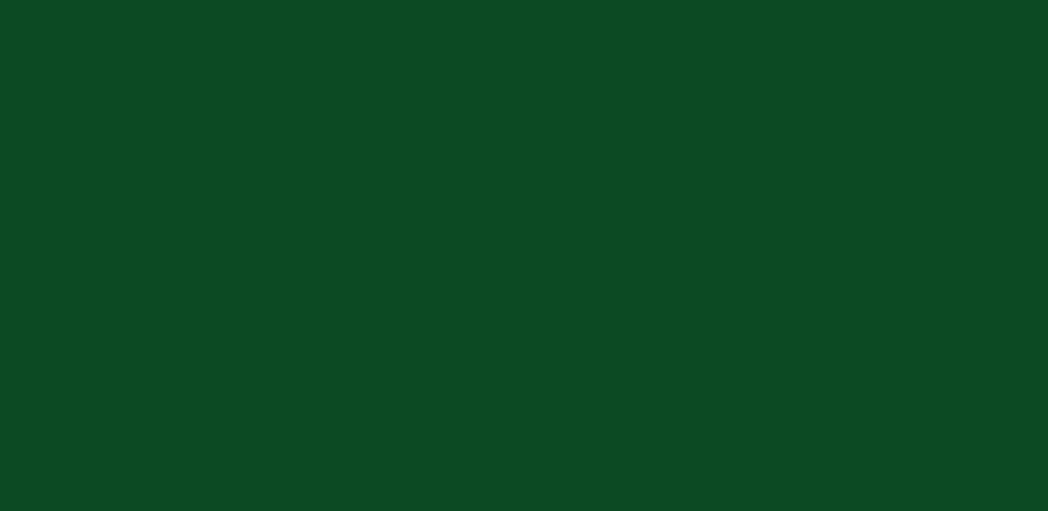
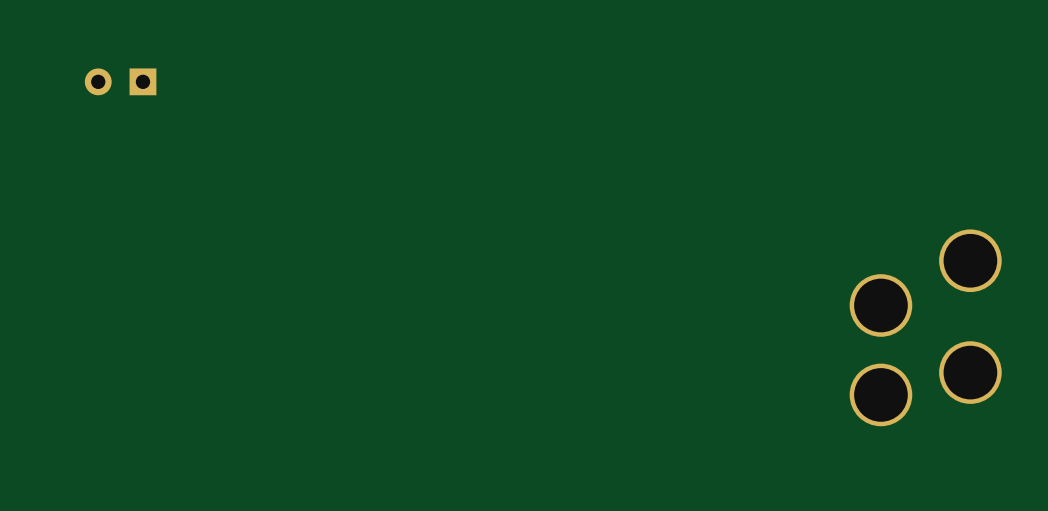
part: none -> (120, 81)
part: none -> (970, 260)
part: none -> (880, 305)
part: none -> (970, 372)
part: none -> (880, 394)

